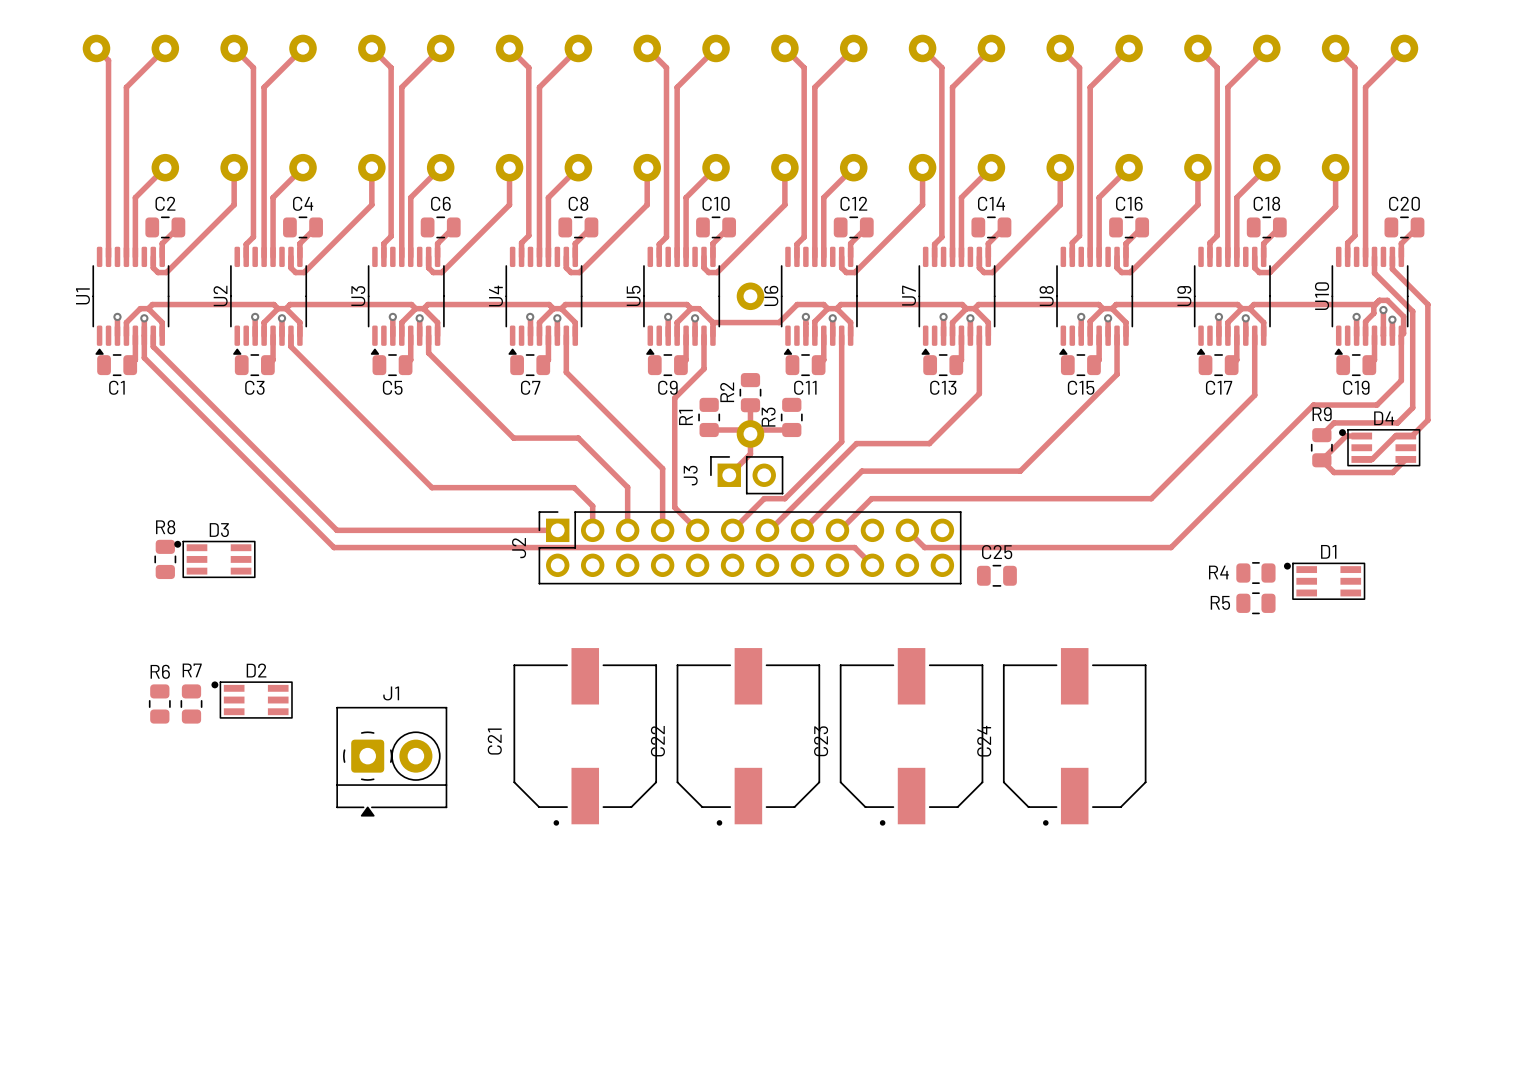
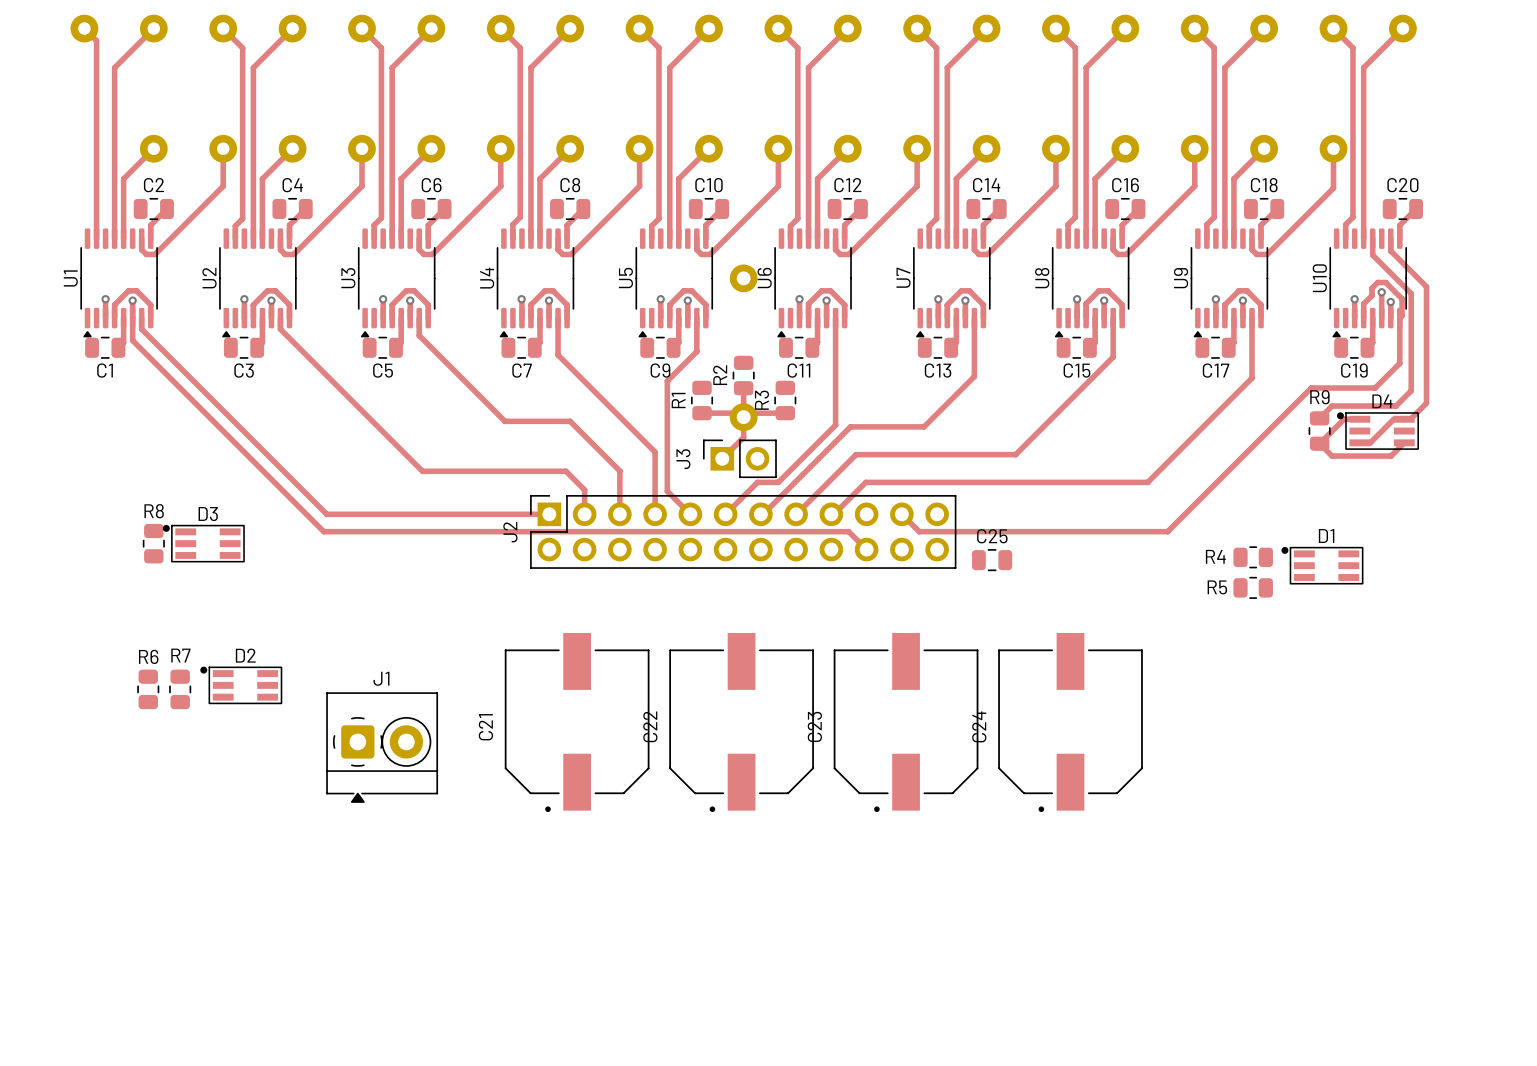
track: (1375, 304) (1253, 304) (1249, 308) -> none
track: (148, 308) (152, 304) (273, 304) (278, 308) -> none
track: (286, 308) (290, 304) (411, 304) (415, 308) -> none
track: (423, 308) (427, 304) (549, 304) (553, 308) -> none
track: (561, 308) (565, 304) (686, 304) (691, 308) -> none
track: (827, 308) (823, 304) (797, 304) (779, 322) (712, 322) -> none
track: (836, 308) (840, 304) (962, 304) (966, 308) -> none
track: (974, 308) (978, 304) (1098, 304) (1102, 308) -> none
track: (1112, 308) (1116, 304) (1237, 304) (1241, 308) -> none

